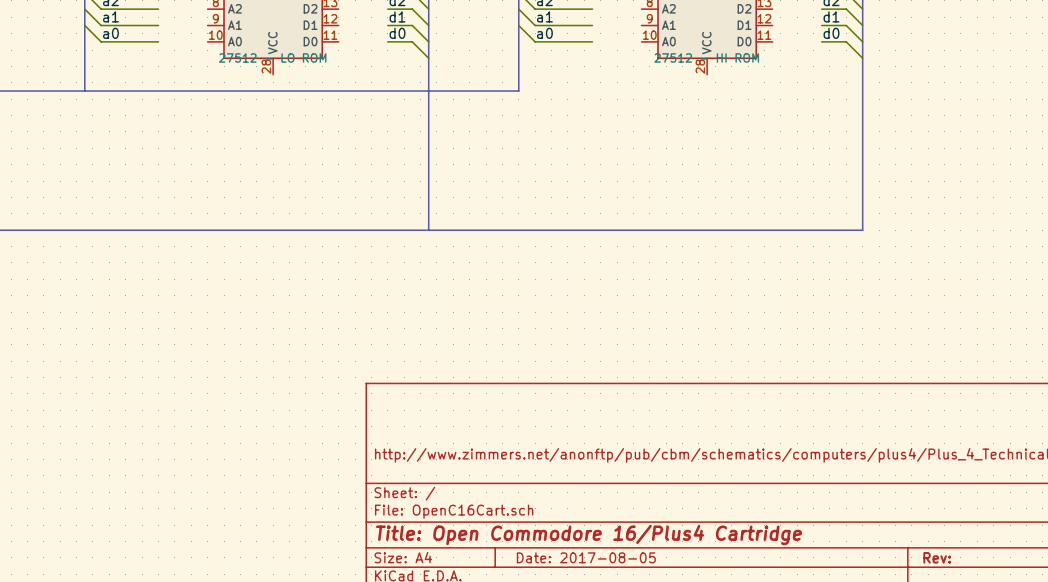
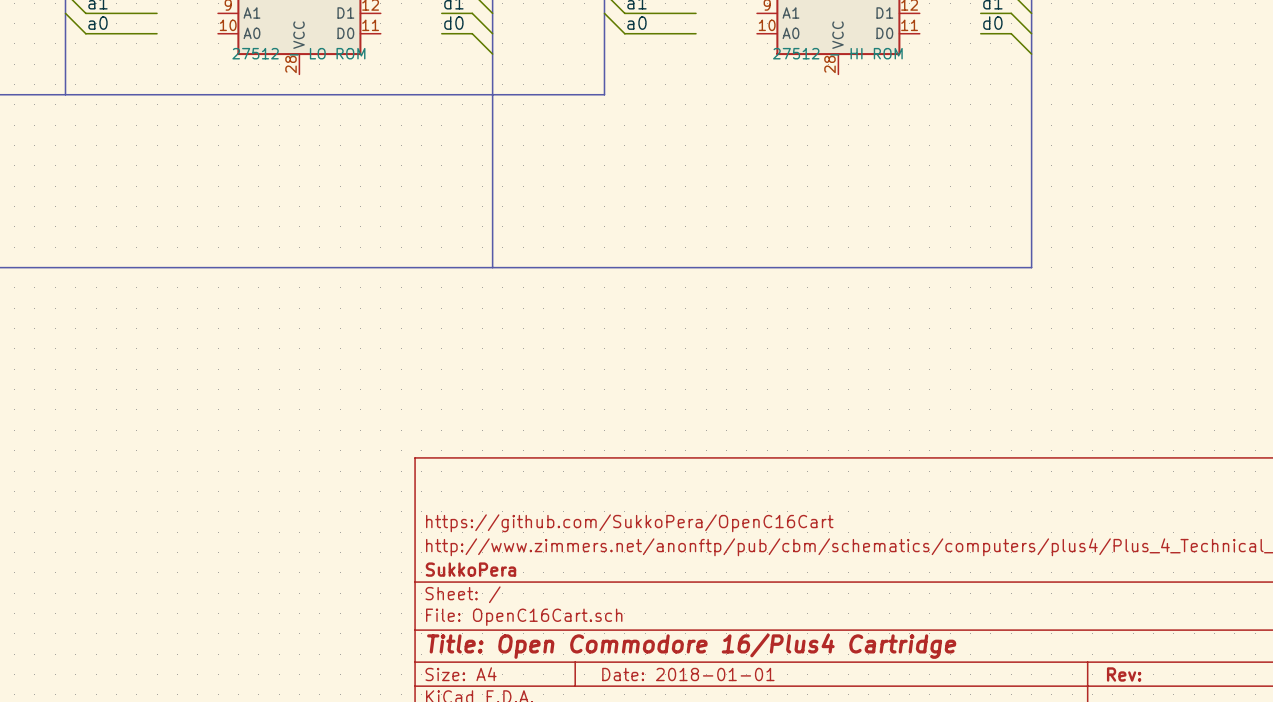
title block: none -> https://github.com/SukkoPera/OpenC16Cart (629, 523)
title block: none -> SukkoPera (470, 569)
title block: Date: 2017-08-05 (586, 557) -> Date: 2018-01-01 (688, 674)

